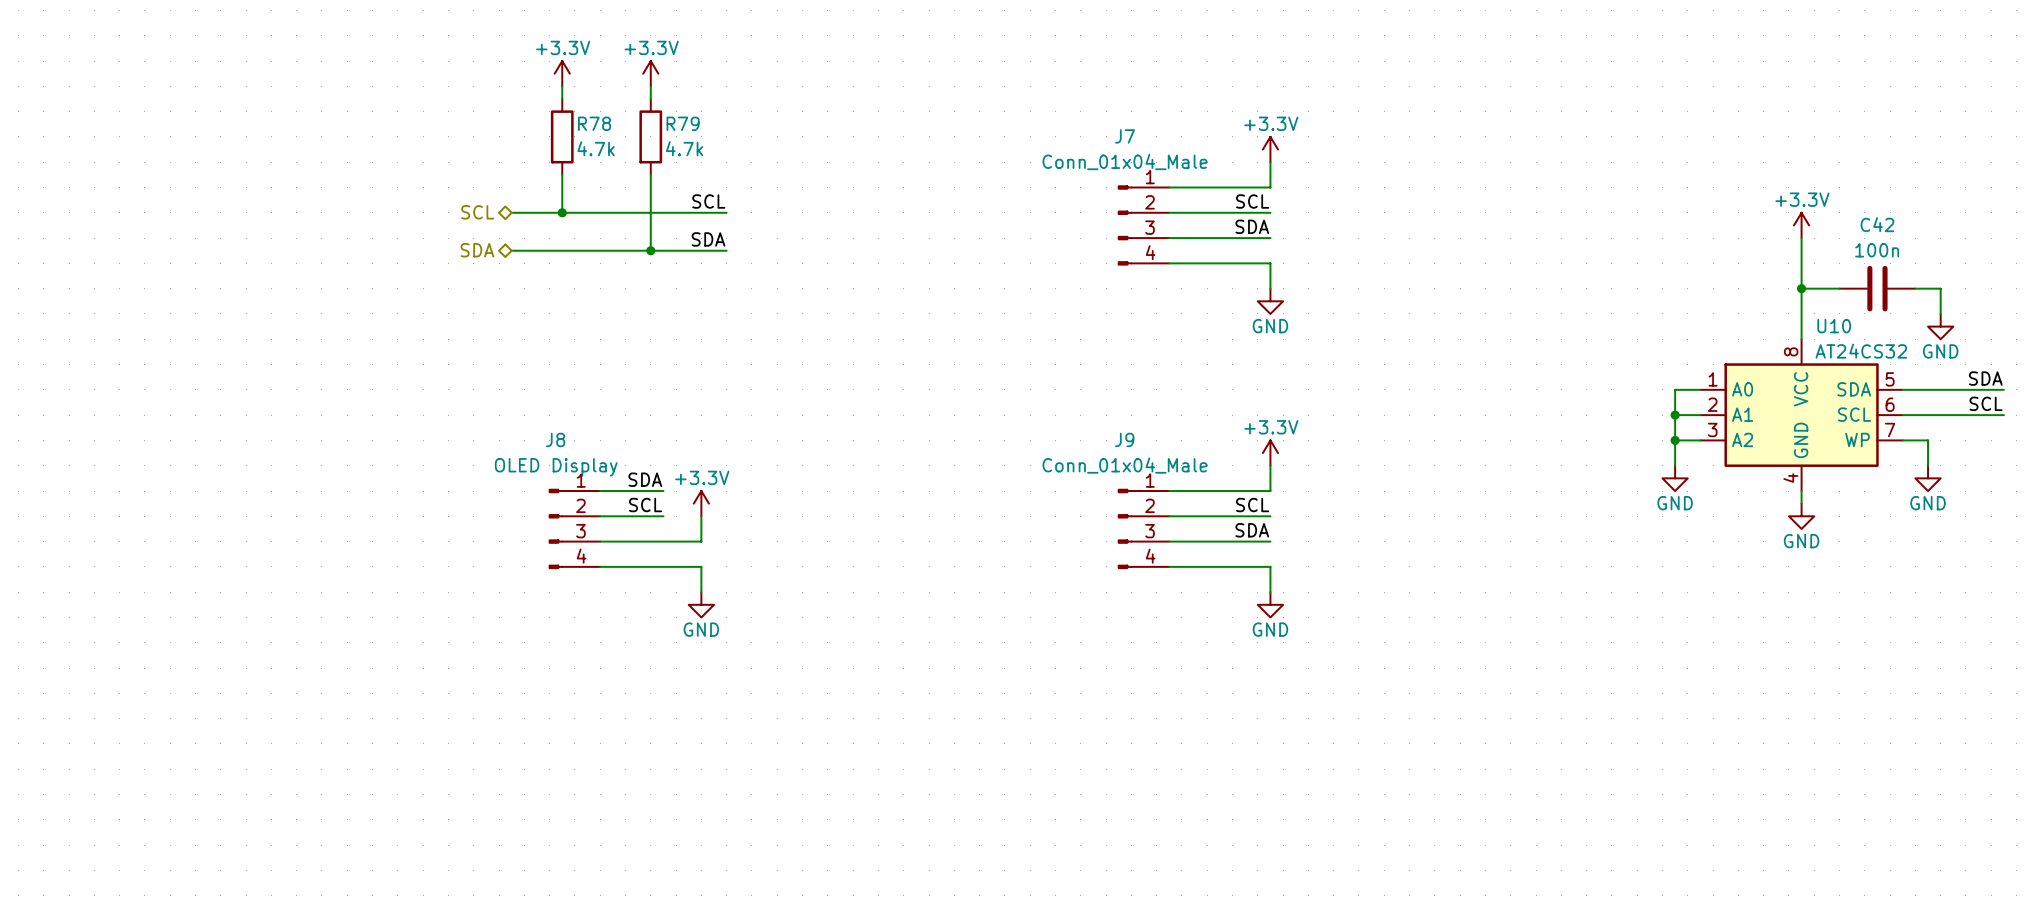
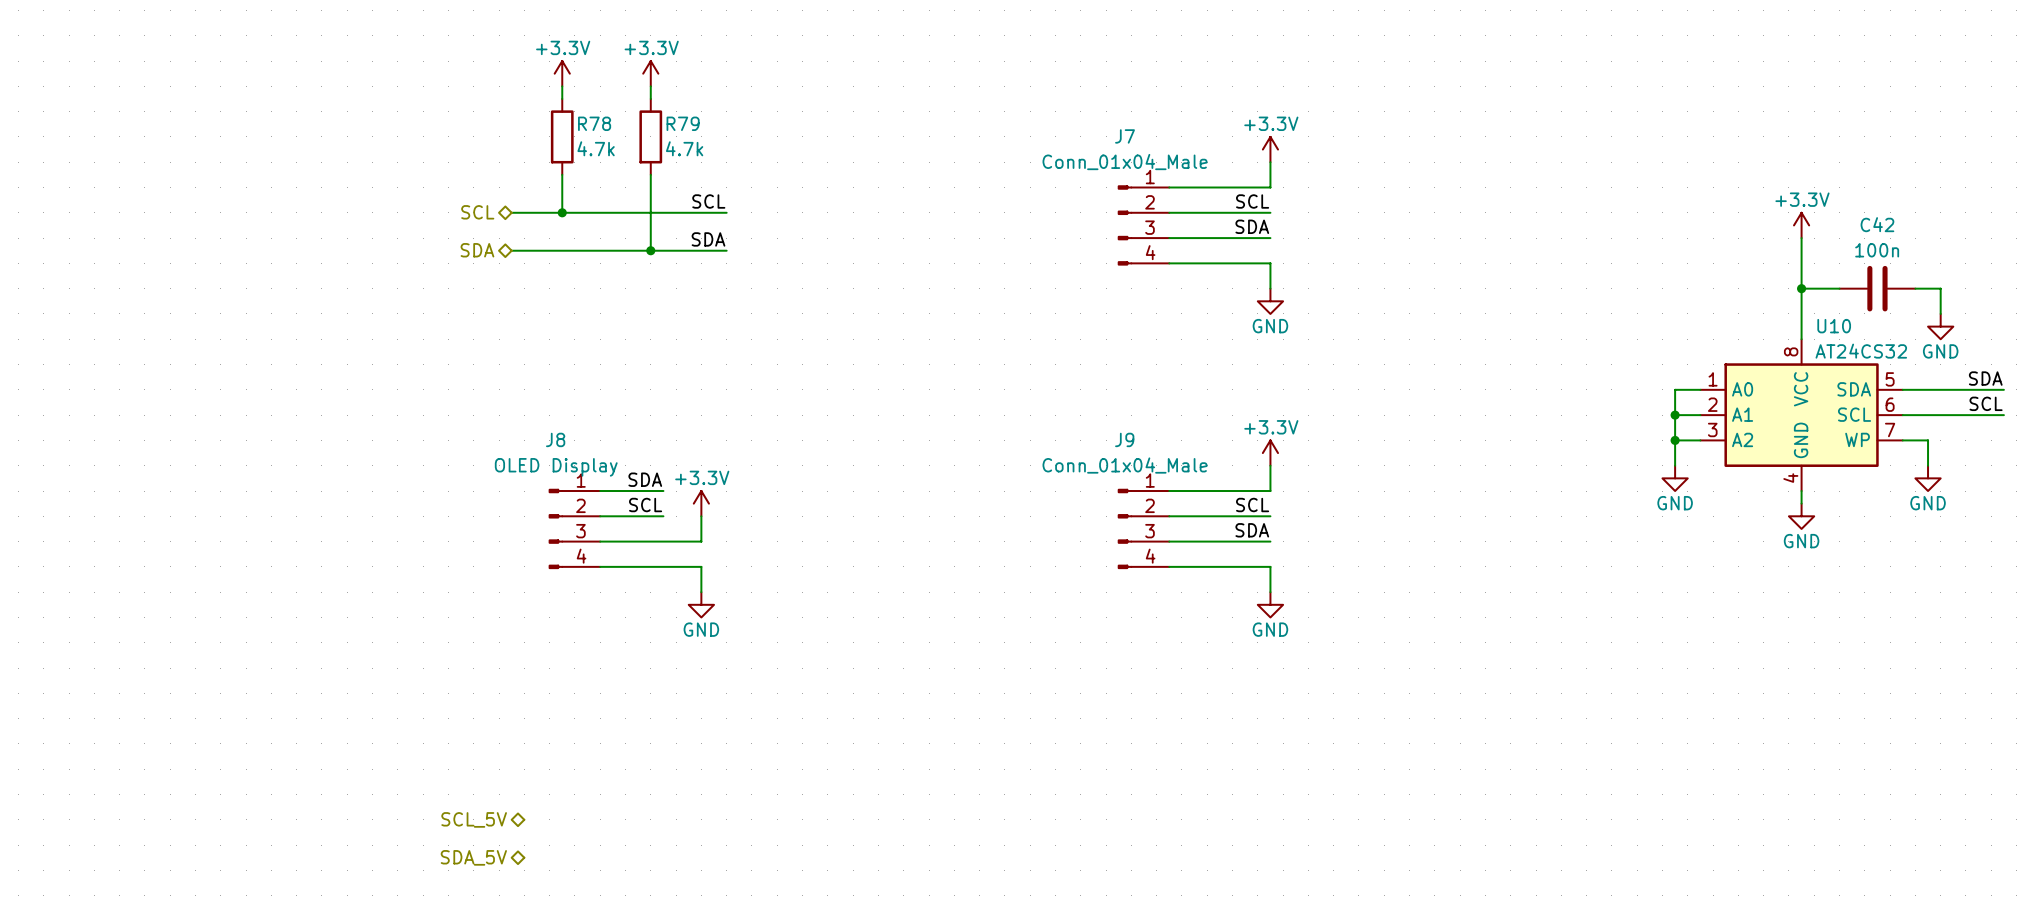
hierarchical label: none -> SCL_5V (474, 819)
hierarchical label: none -> SDA_5V (473, 857)

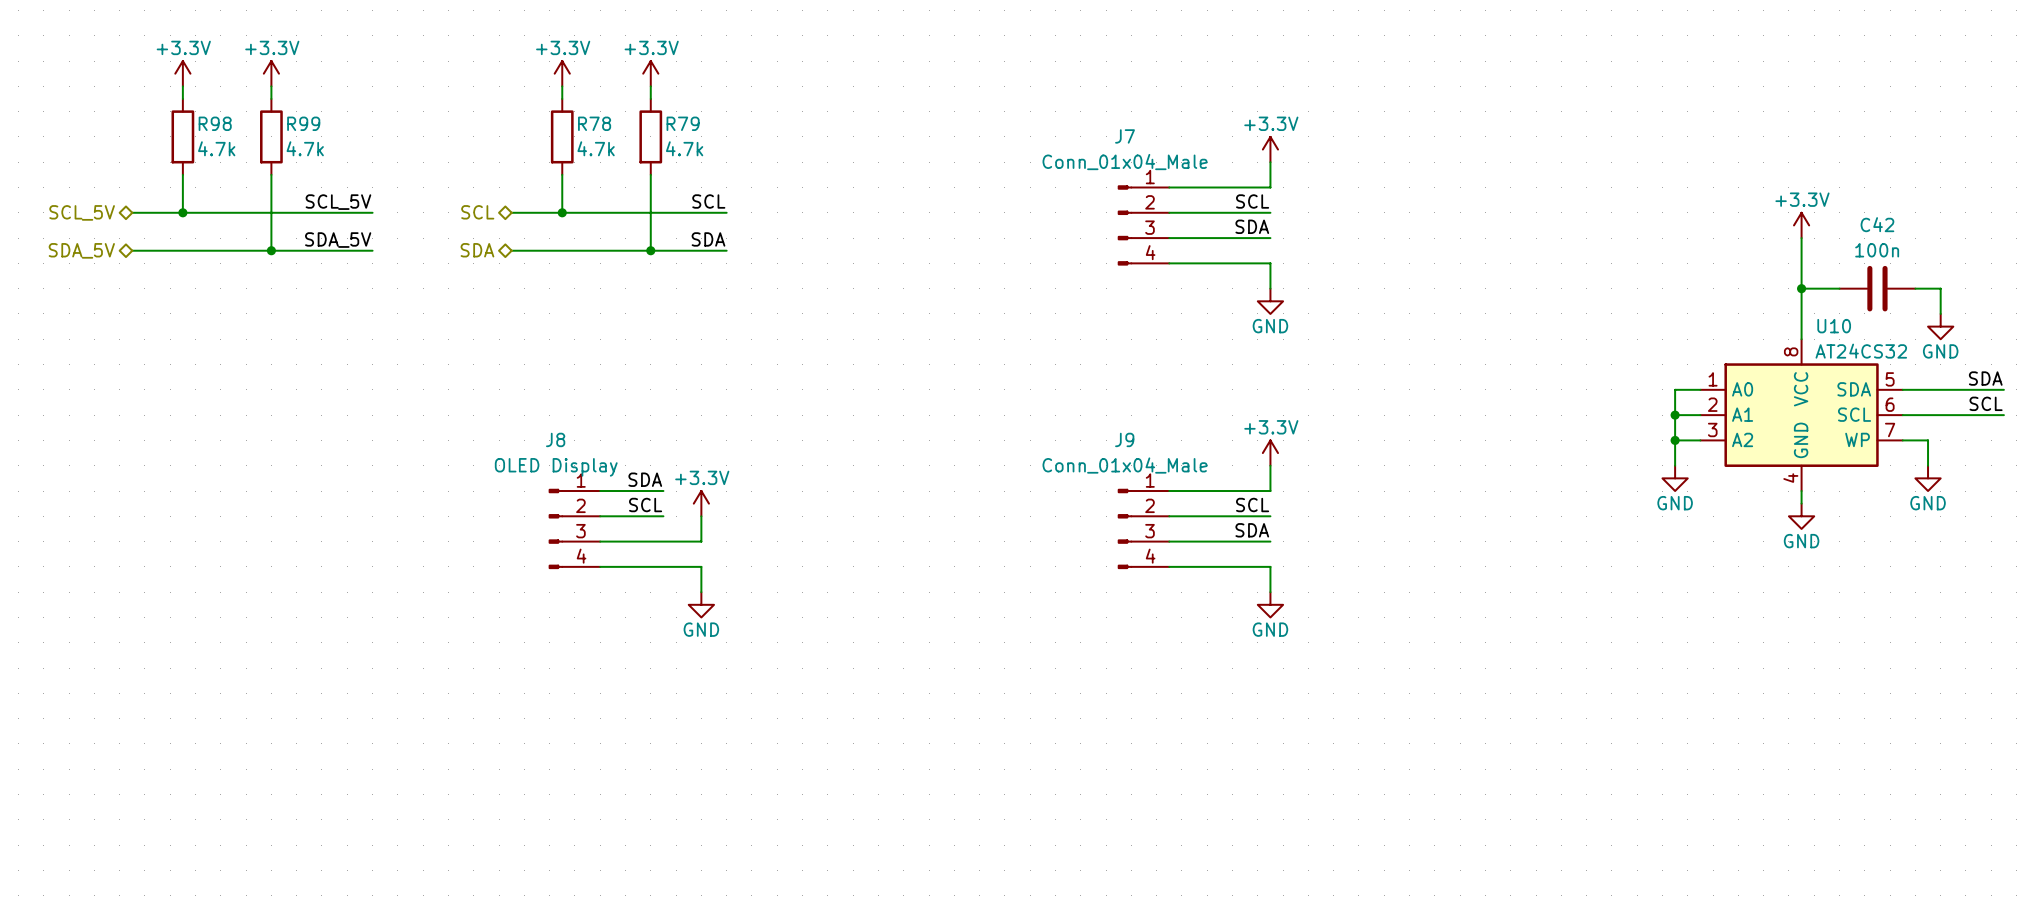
power symbol: none -> +3.3V (182, 73)
power symbol: none -> +3.3V (271, 73)
wire: none -> (182, 86) (182, 98)
wire: none -> (271, 86) (271, 98)
R98: none -> 4.7k (182, 136)
R99: none -> 4.7k (271, 136)
wire: none -> (182, 174) (182, 212)
wire: none -> (271, 174) (271, 250)
label: none -> SCL_5V (338, 202)
hierarchical label: none -> SCL_5V (82, 212)
wire: none -> (132, 212) (372, 212)
junction: none -> (182, 212)
label: none -> SDA_5V (338, 240)
hierarchical label: none -> SDA_5V (81, 250)
wire: none -> (132, 250) (372, 250)
junction: none -> (271, 250)
hierarchical label: SCL_5V (474, 819) -> none
hierarchical label: SDA_5V (473, 857) -> none

